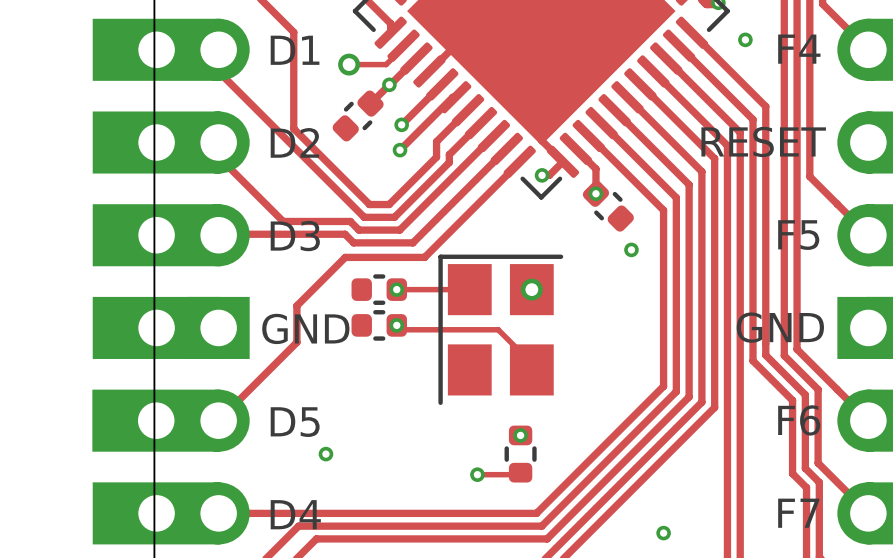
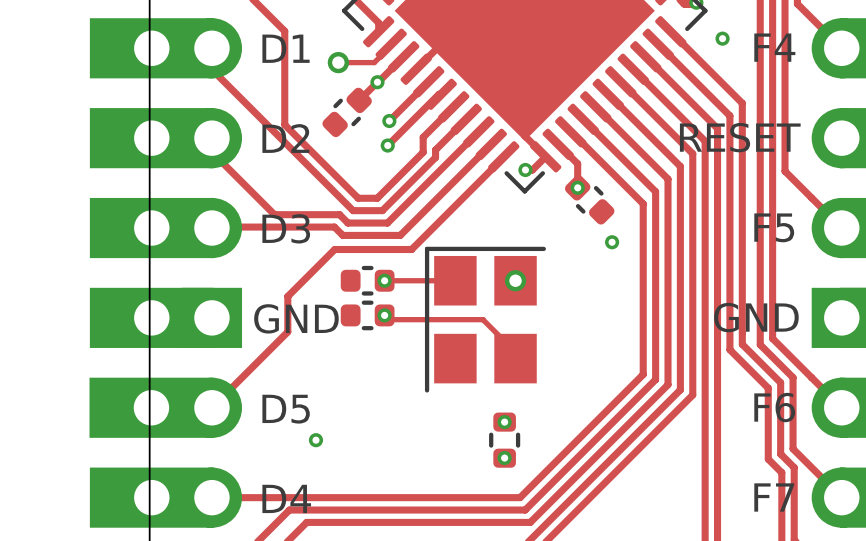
track: (520, 472) (518, 474) (477, 474) -> none
via position: (477, 474) -> (504, 458)
via: (663, 533) -> none

